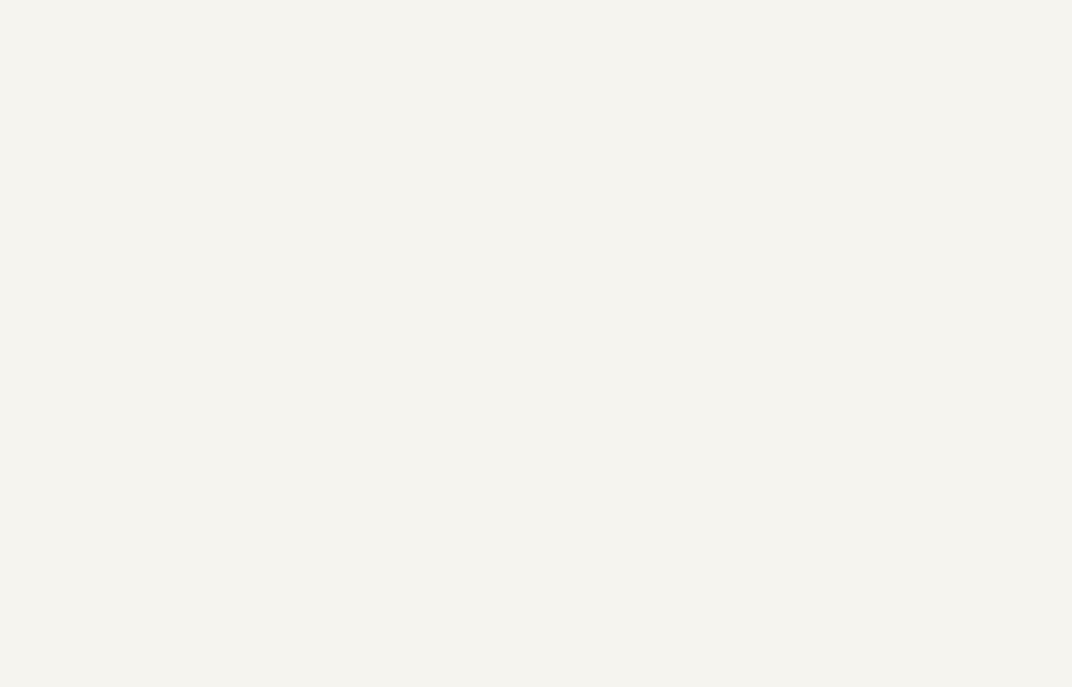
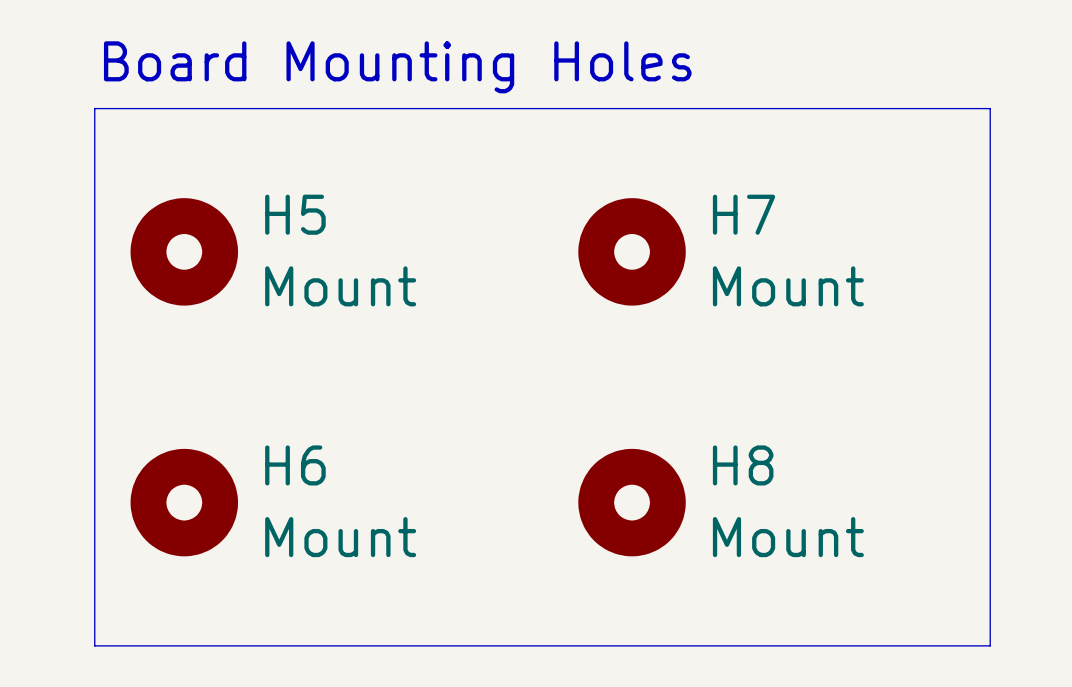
text: none -> Board Mounting Holes (397, 67)
line: none -> (94, 108) (990, 108) (990, 645) (94, 645) (94, 108)
H5: none -> Mount (184, 251)
H7: none -> Mount (632, 251)
H6: none -> Mount (184, 502)
H8: none -> Mount (632, 502)

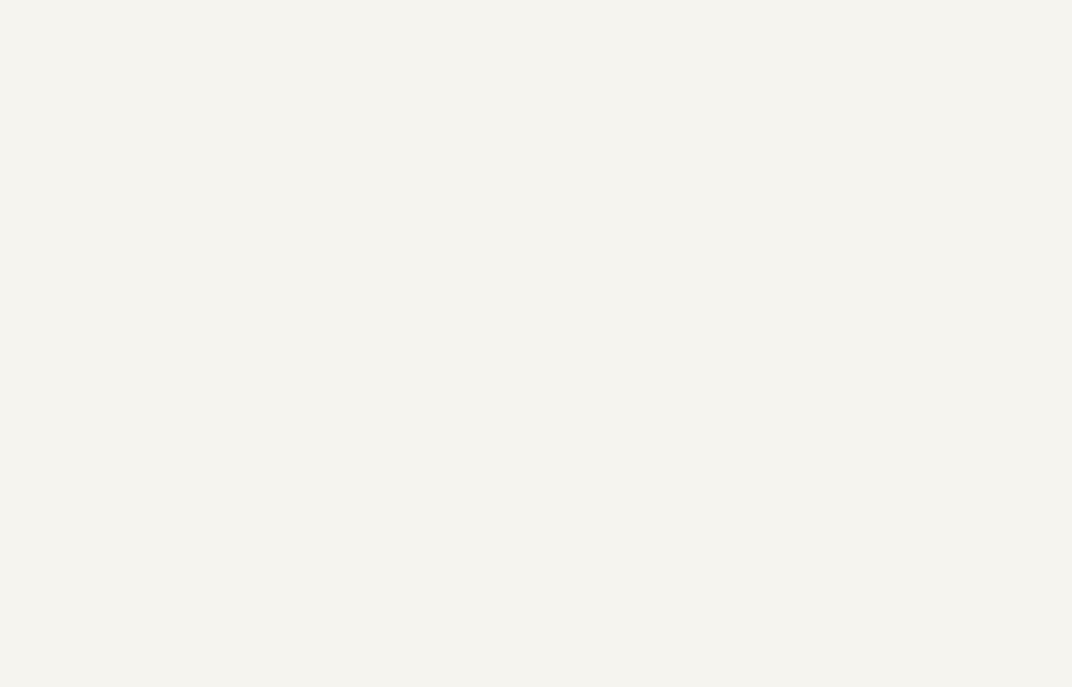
text: Board Mounting Holes (397, 67) -> none
line: (94, 108) (990, 108) (990, 645) (94, 645) (94, 108) -> none
H5: Mount (184, 251) -> none
H7: Mount (632, 251) -> none
H6: Mount (184, 502) -> none
H8: Mount (632, 502) -> none

